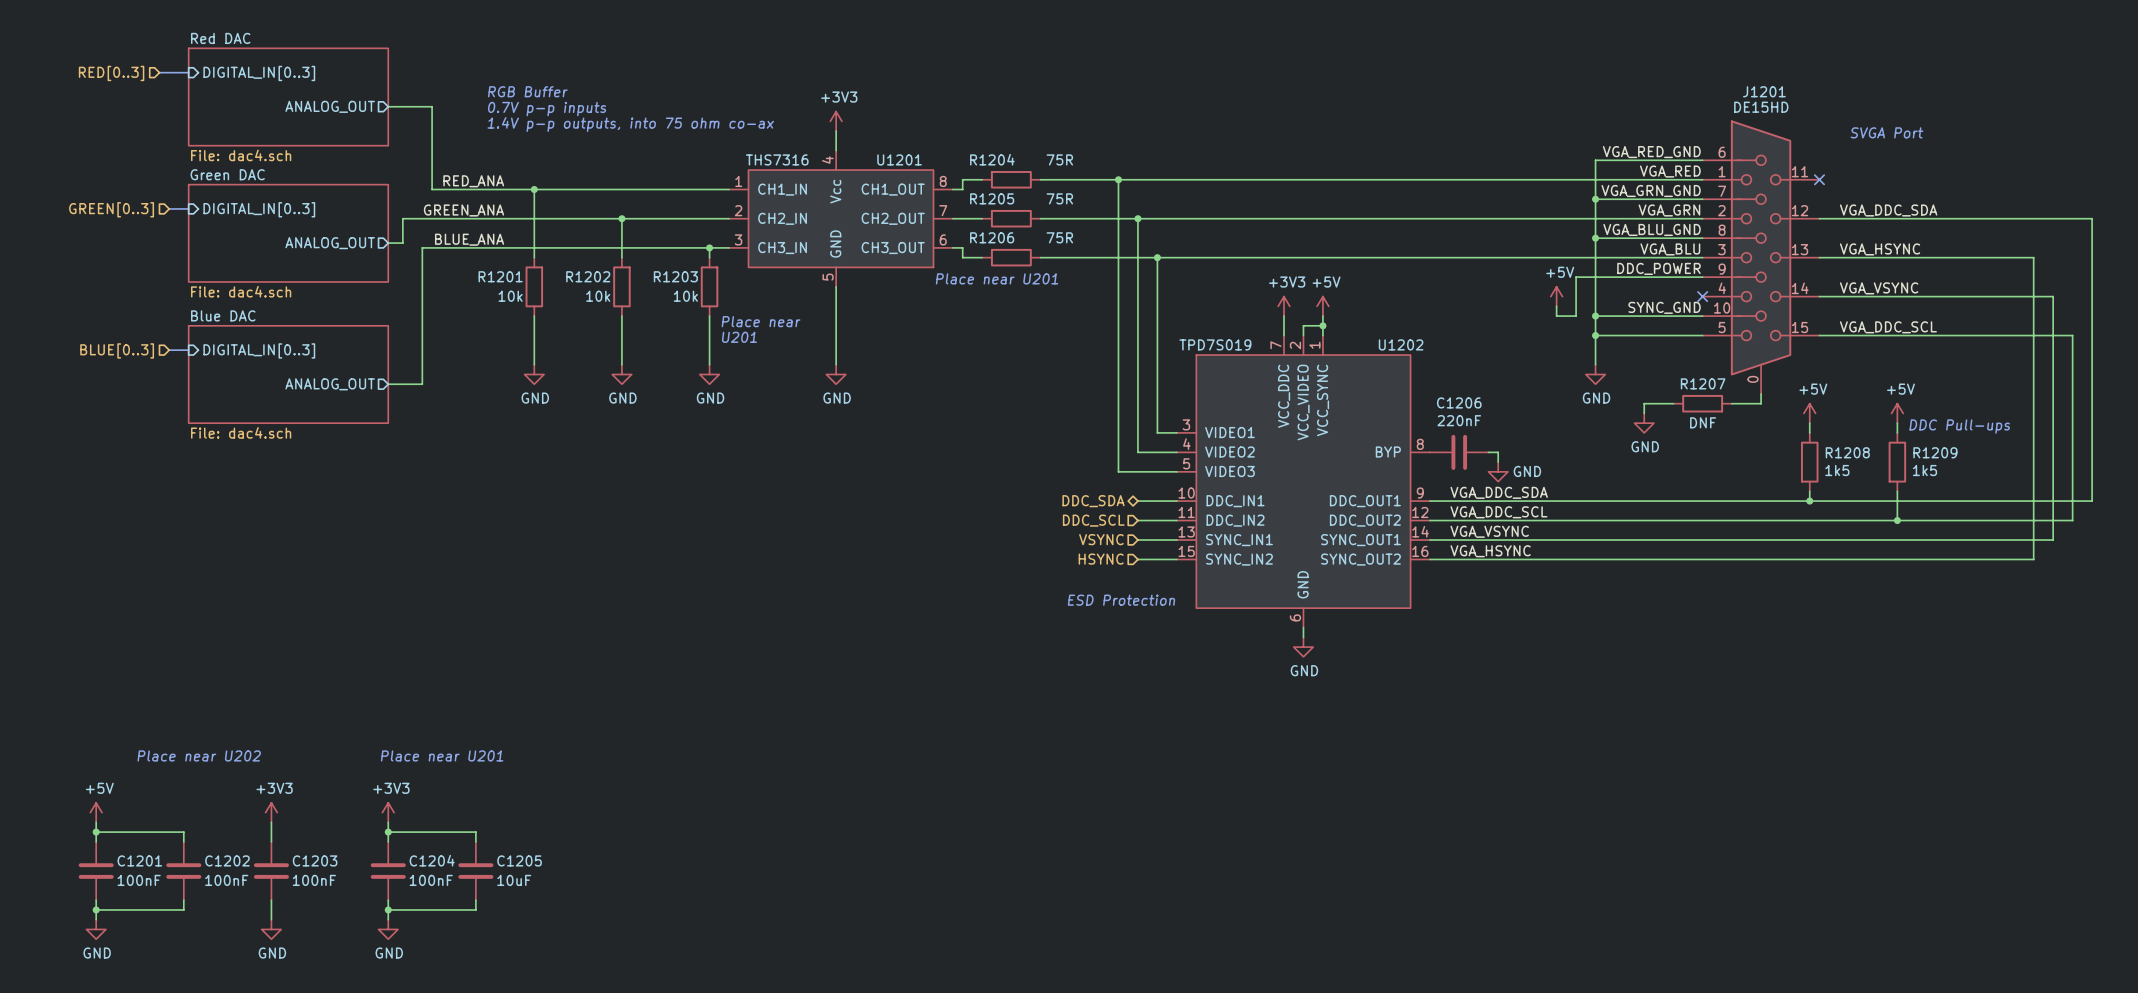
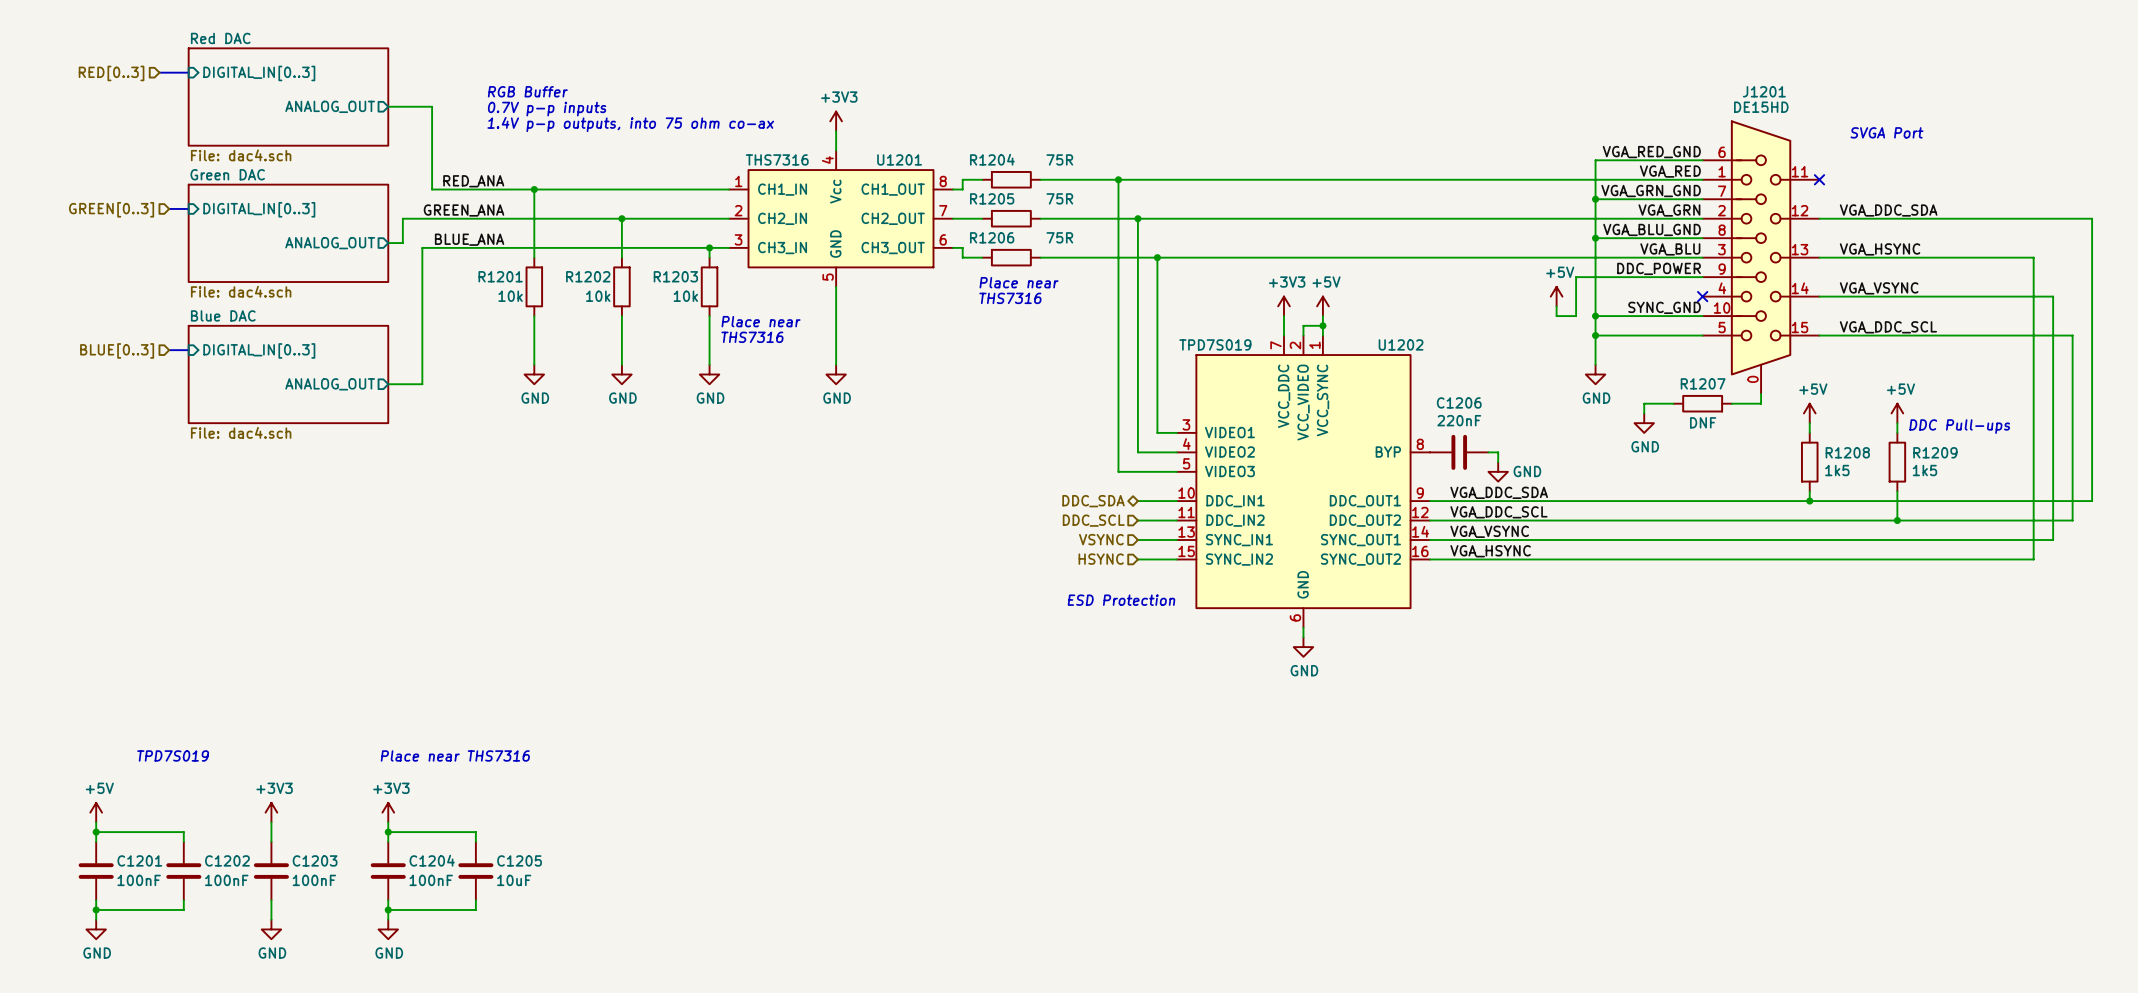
text: Place near U201 (997, 278) -> Place near (1019, 282)
text: none -> THS7316 (1010, 298)
text: U201 (739, 337) -> THS7316 (752, 337)
text: Place near U202 (199, 755) -> TPD7S019 (173, 755)
text: Place near U201 (442, 755) -> Place near THS7316 (455, 755)

